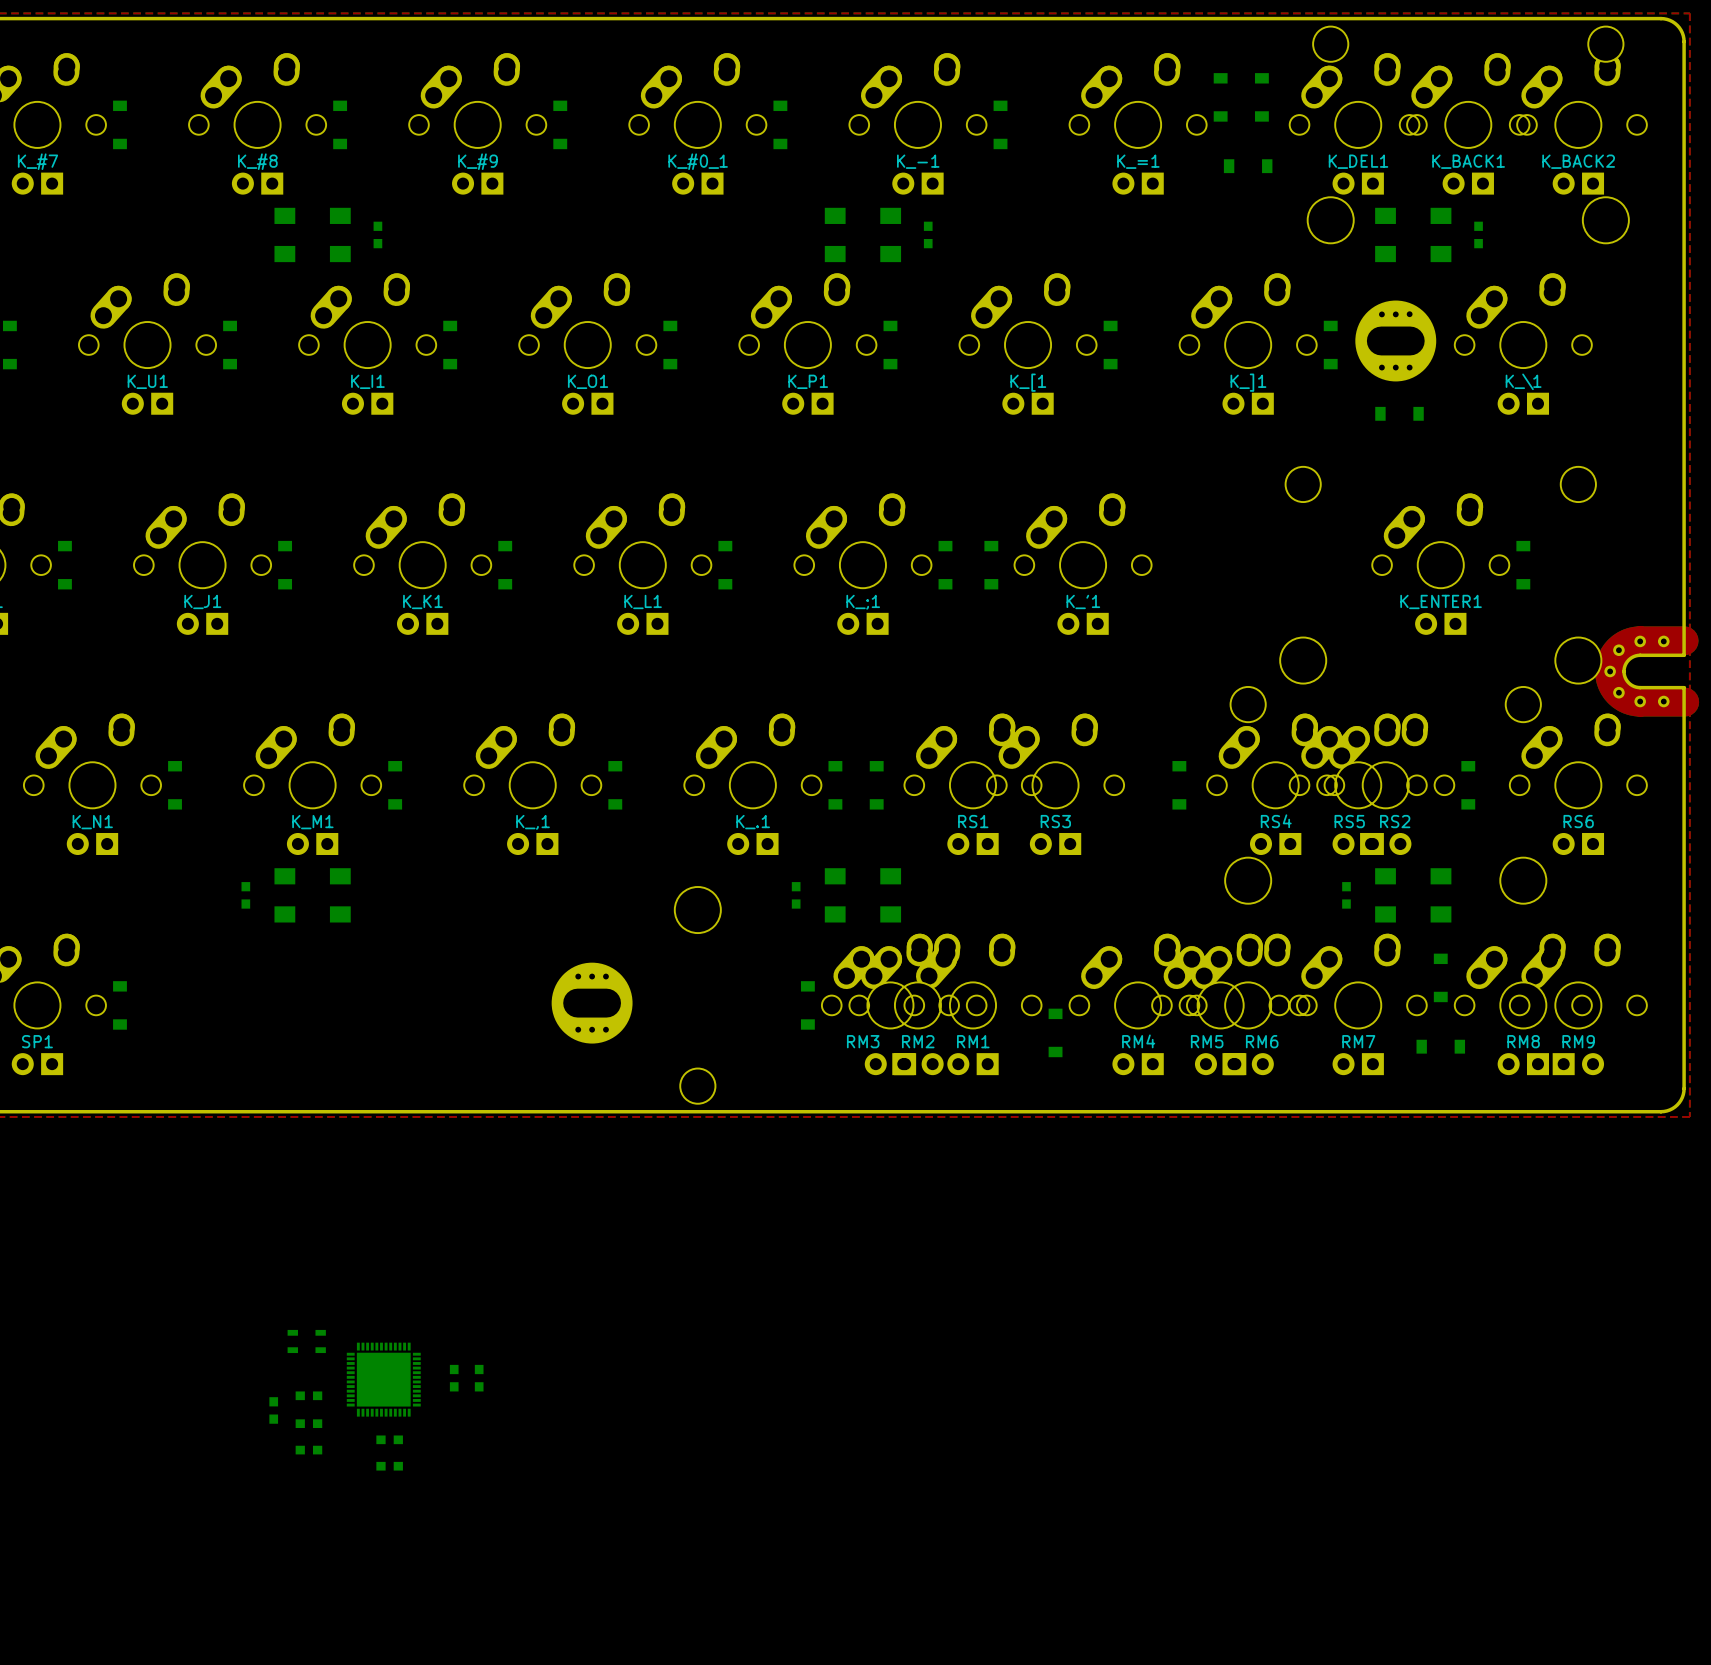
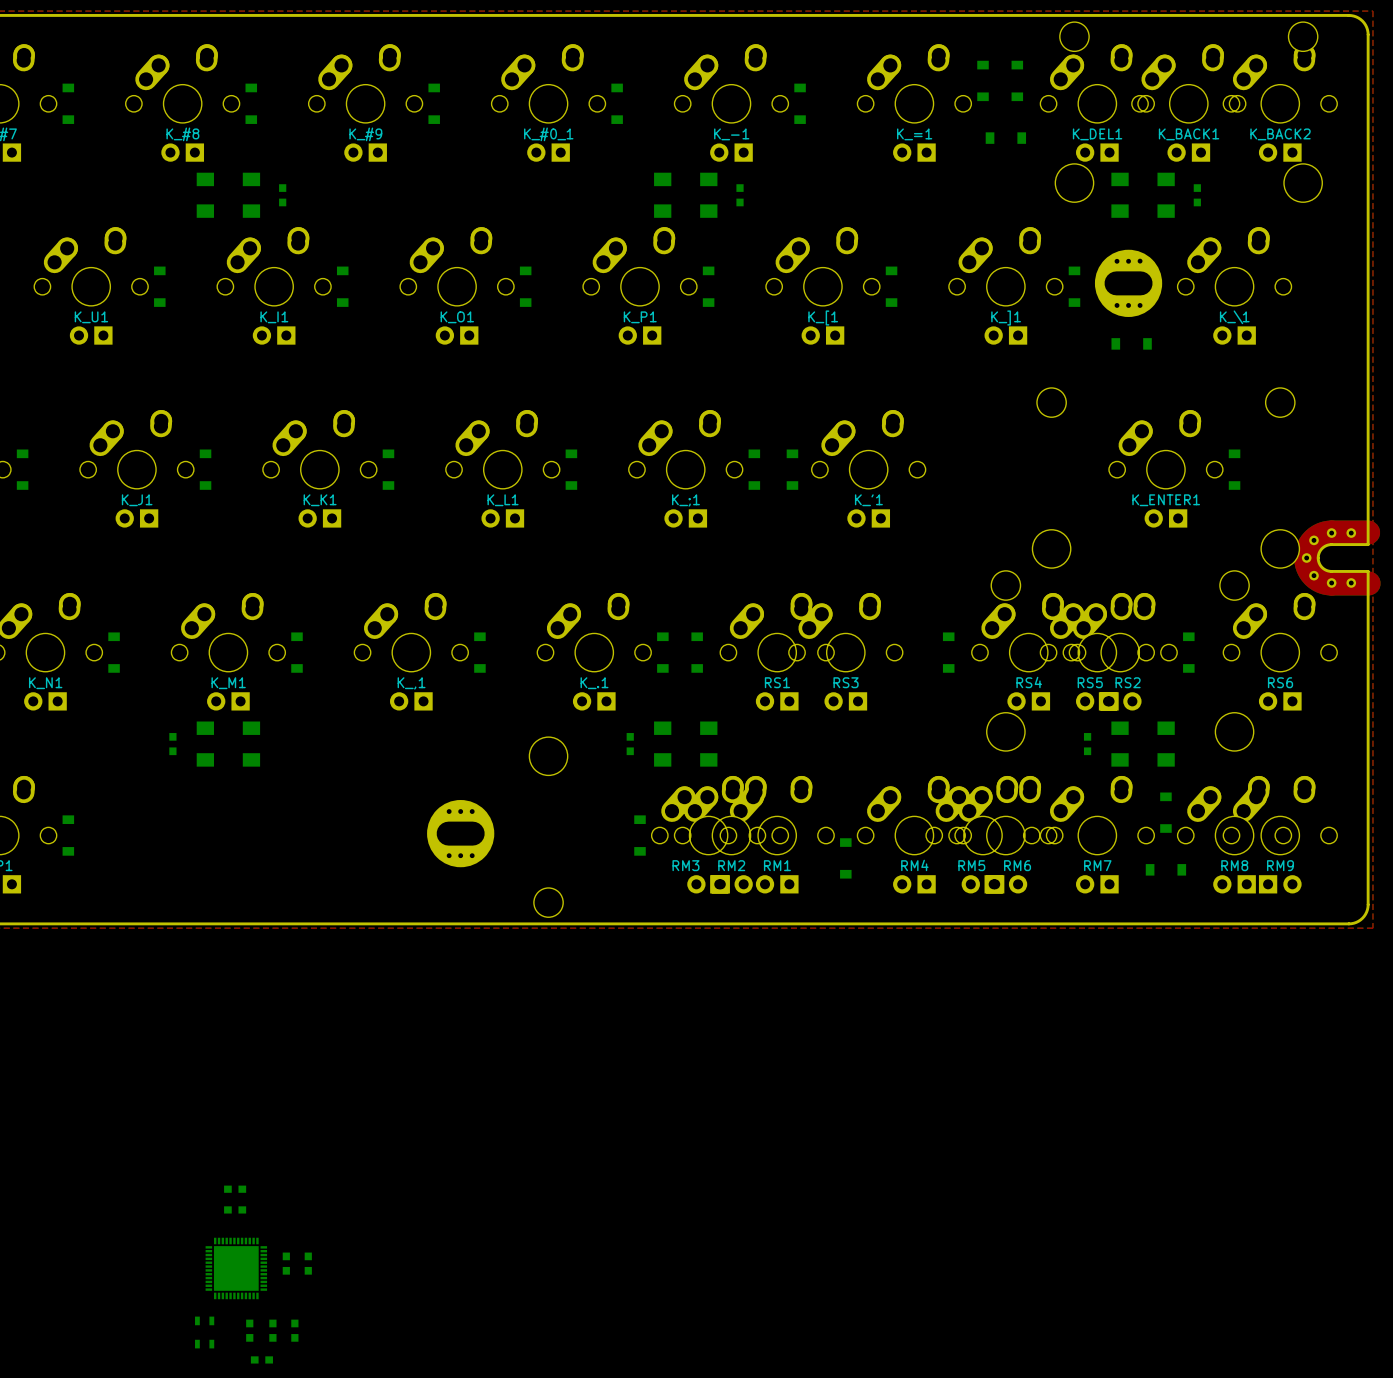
part: (292, 1341) -> none
part: (320, 1341) -> none
part: (454, 1378) -> none
part: (479, 1378) -> none
part position: (383, 1379) -> (236, 1268)
part: (308, 1395) -> none
part: (273, 1410) -> none
part: (308, 1423) -> none
part: none -> (235, 1189)
part: (389, 1439) -> none
part: (308, 1450) -> none
part: none -> (235, 1209)
part: (389, 1466) -> none
part: none -> (286, 1263)
part: none -> (308, 1263)
part: none -> (204, 1320)
part: none -> (249, 1330)
part: none -> (272, 1330)
part: none -> (294, 1330)
part: none -> (204, 1344)
part: none -> (261, 1359)

